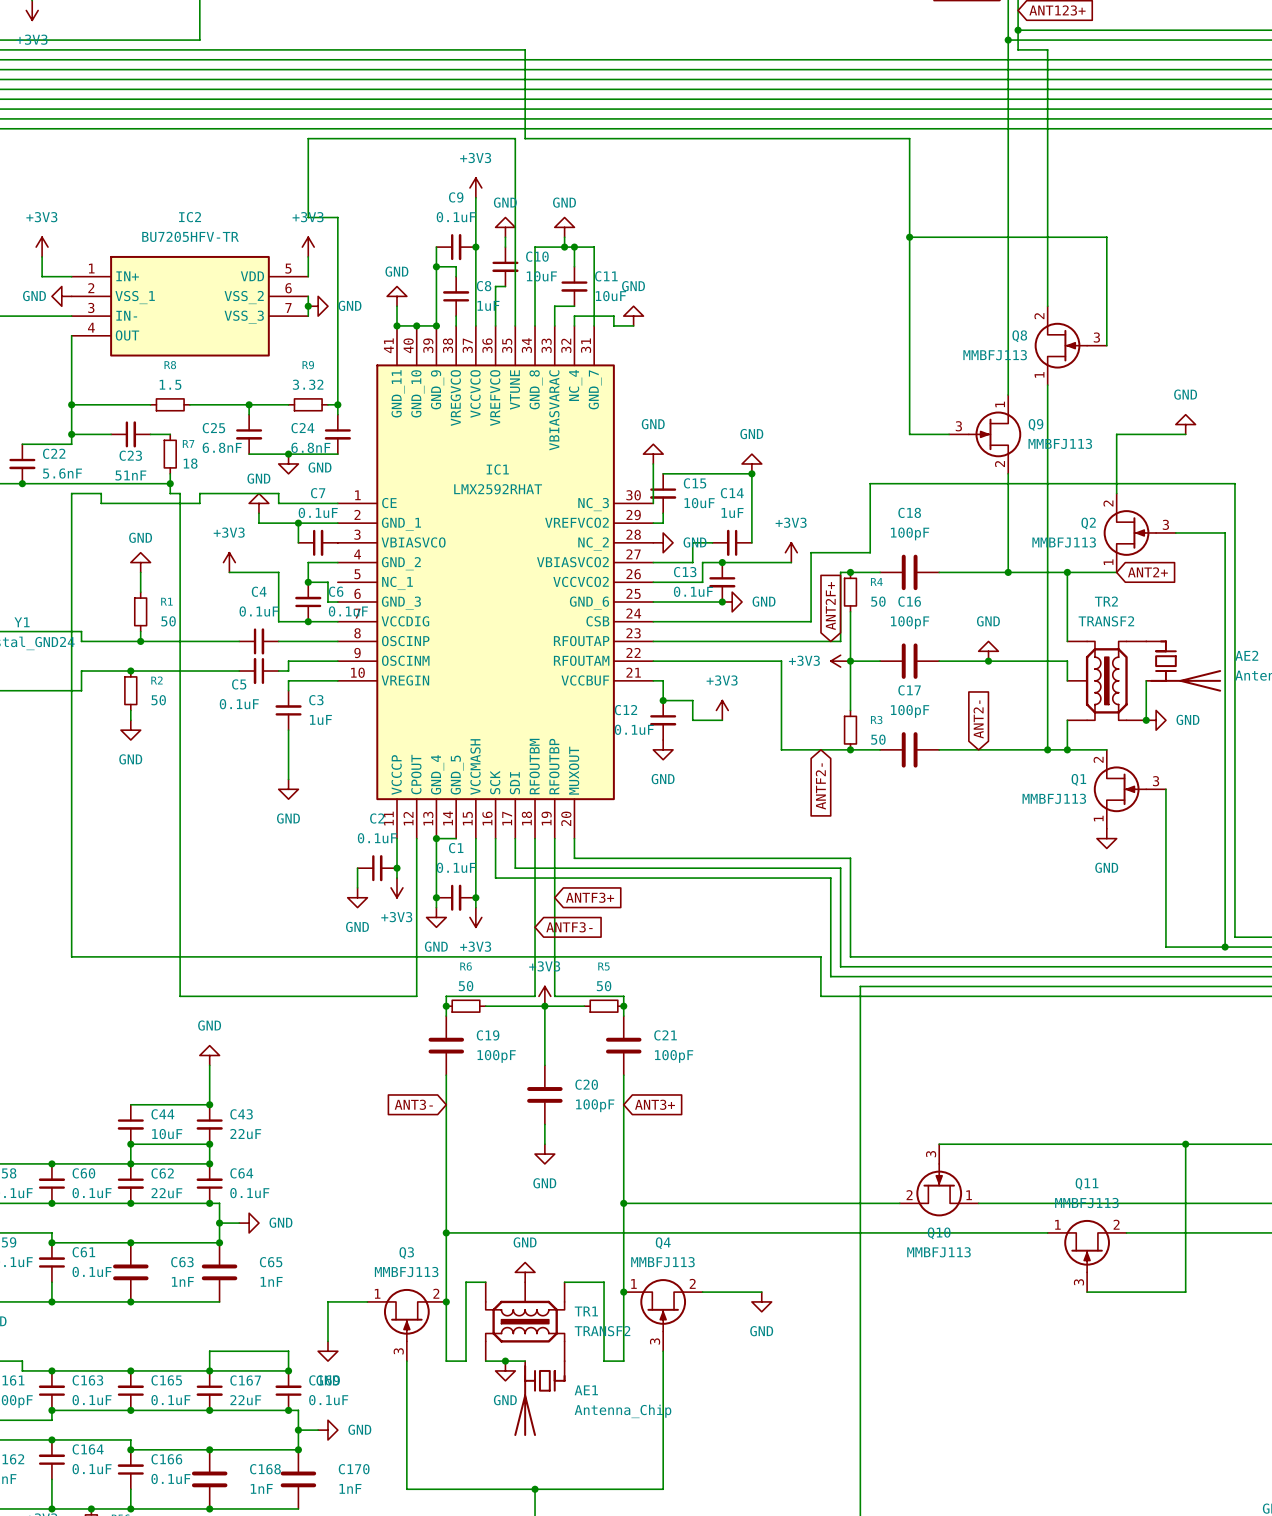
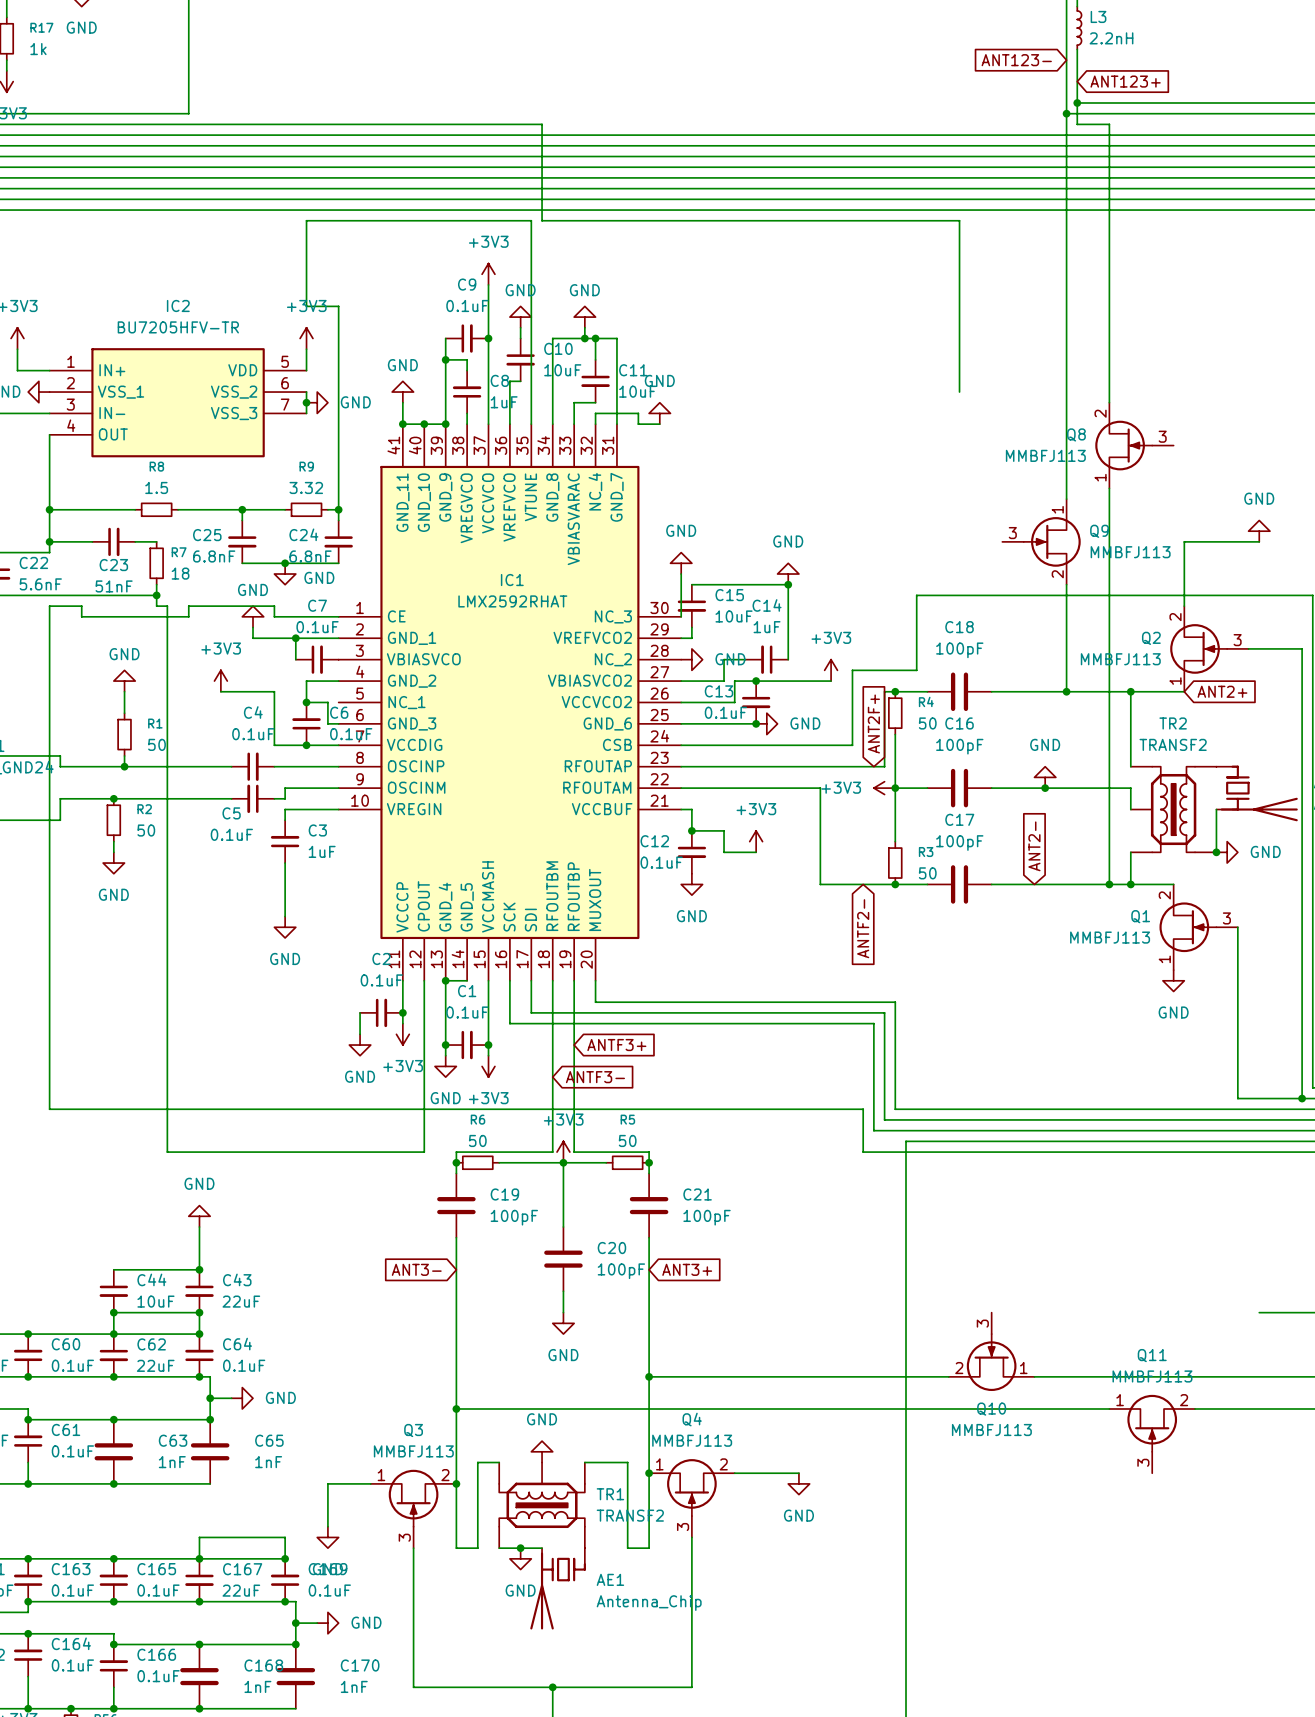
wire: (909, 237) (1106, 237) (1106, 345) -> none
junction: (909, 237) -> none
wire: (909, 296) (909, 434) (949, 434) -> none
wire: (939, 1144) (1185, 1144) (1185, 1292) (1087, 1292) -> none
junction: (1185, 1144) -> none

